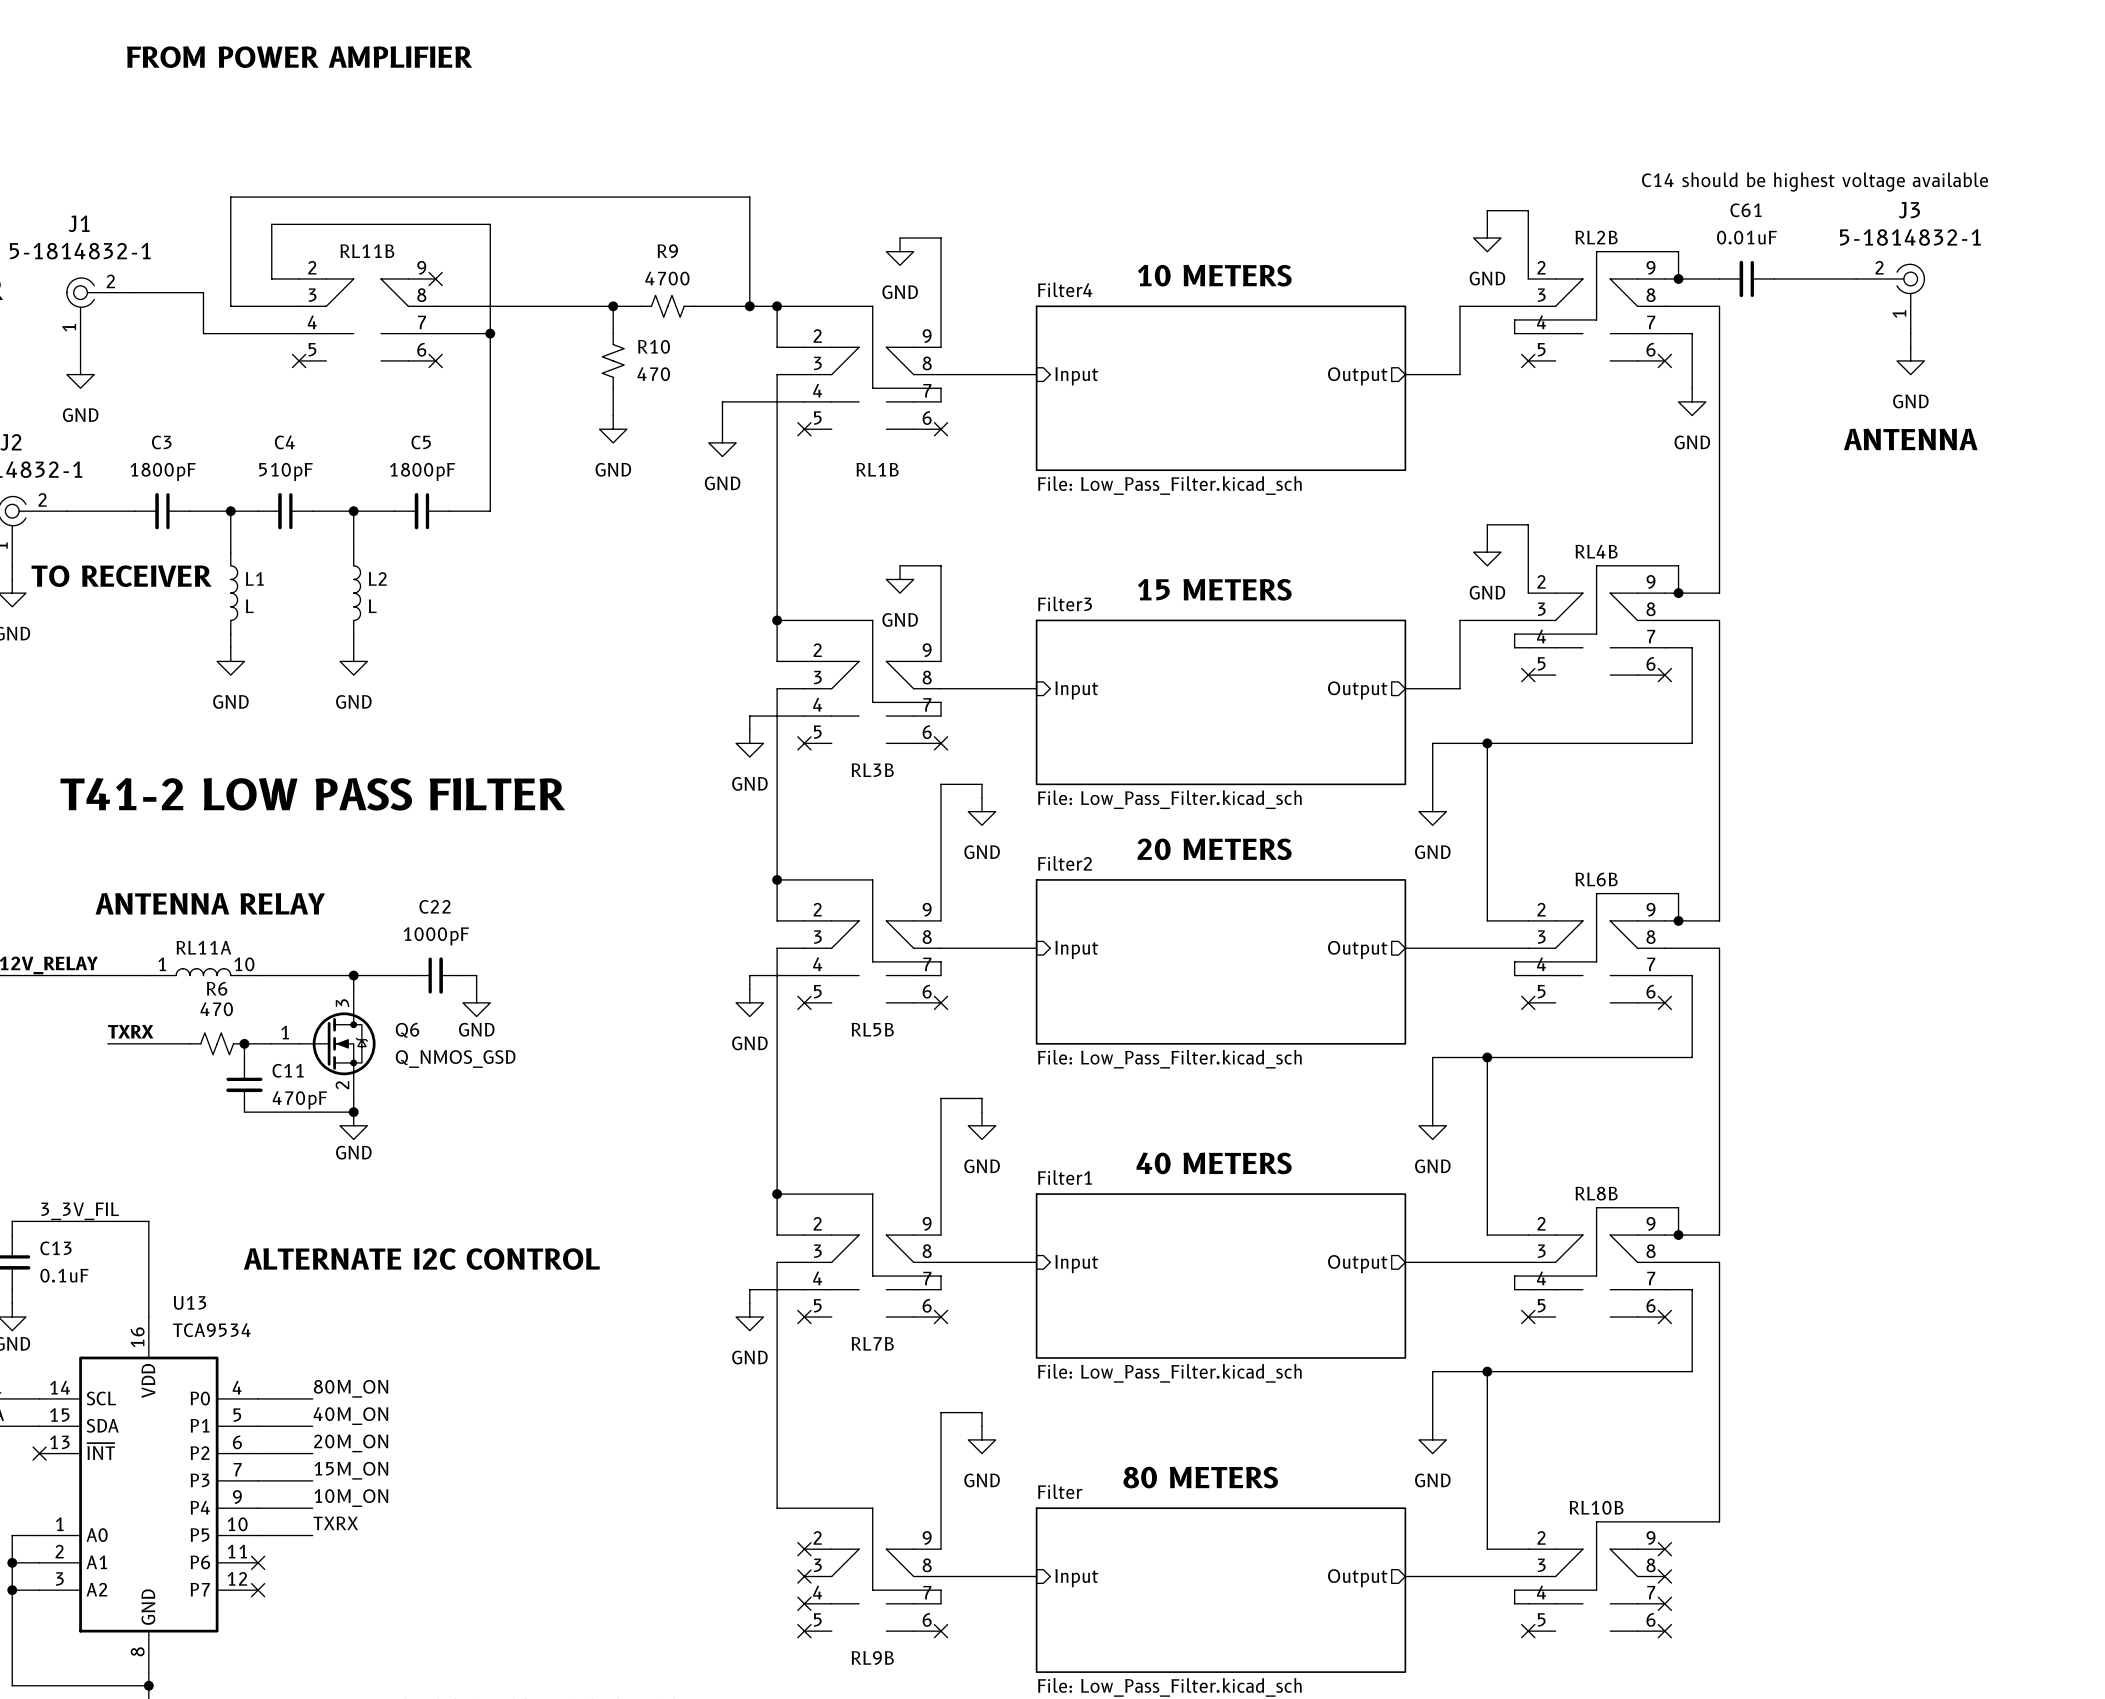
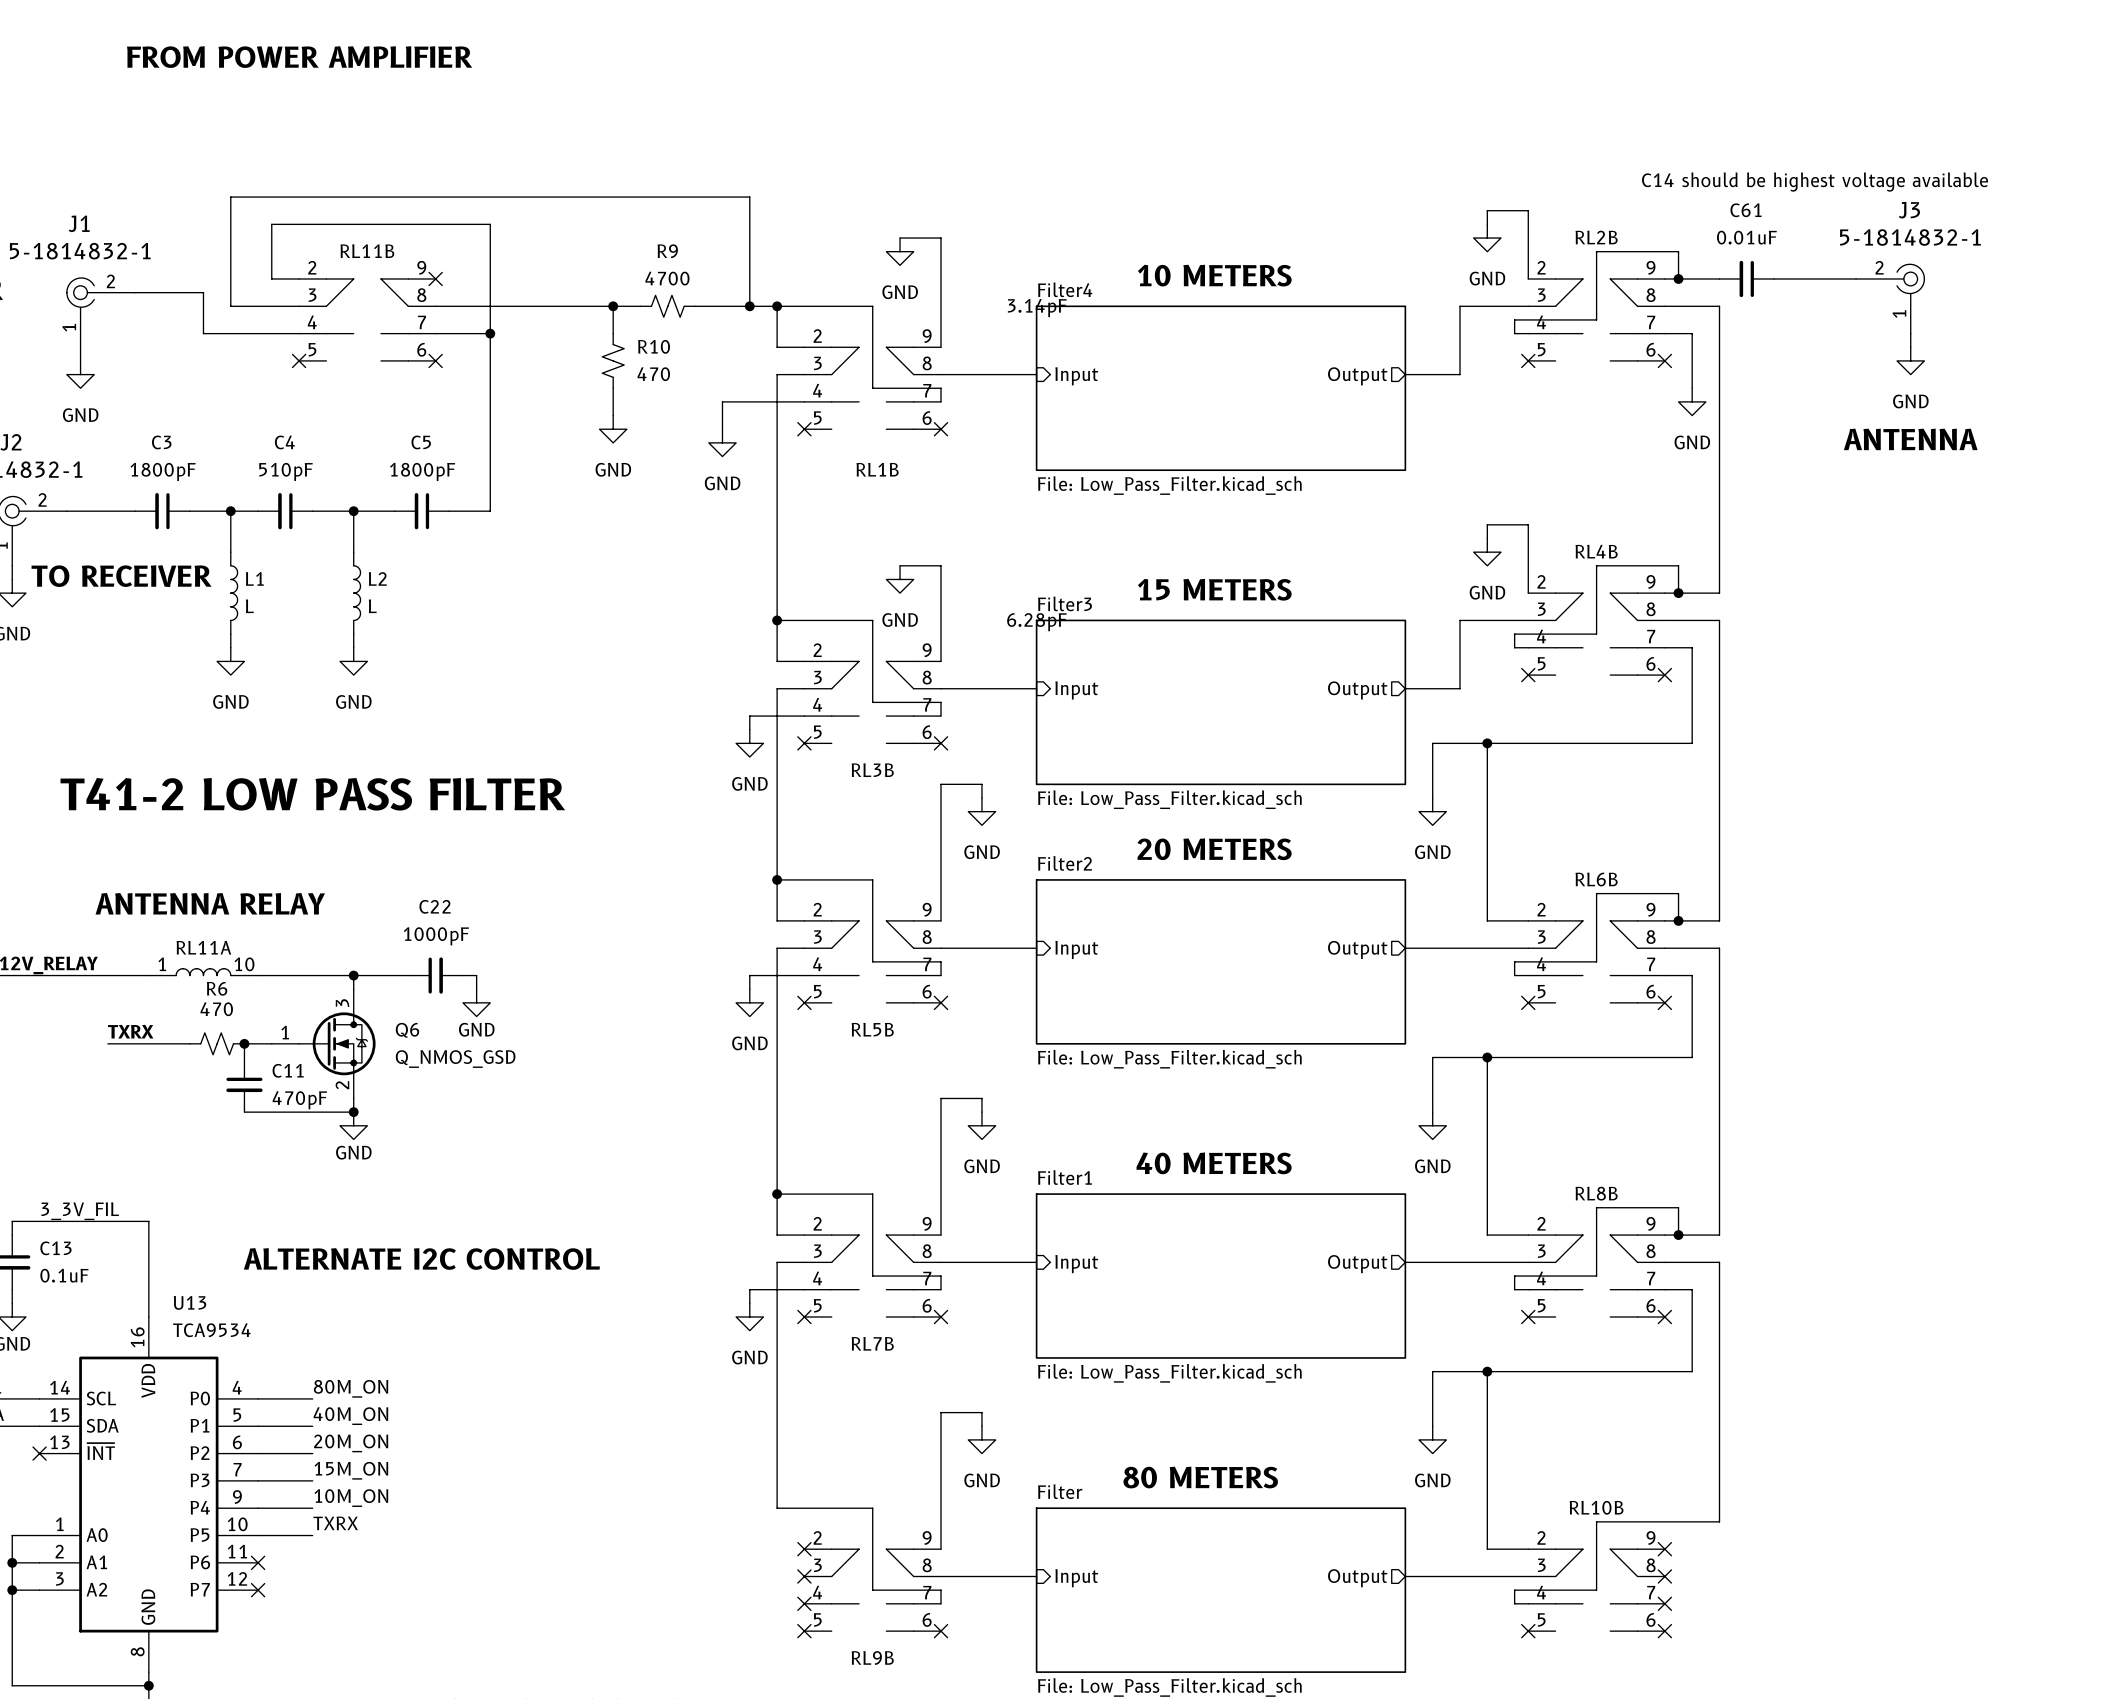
sheet Filter4 text: none -> 3.14pF (1037, 308)
sheet Filter3 text: none -> 6.28pF (1036, 622)

